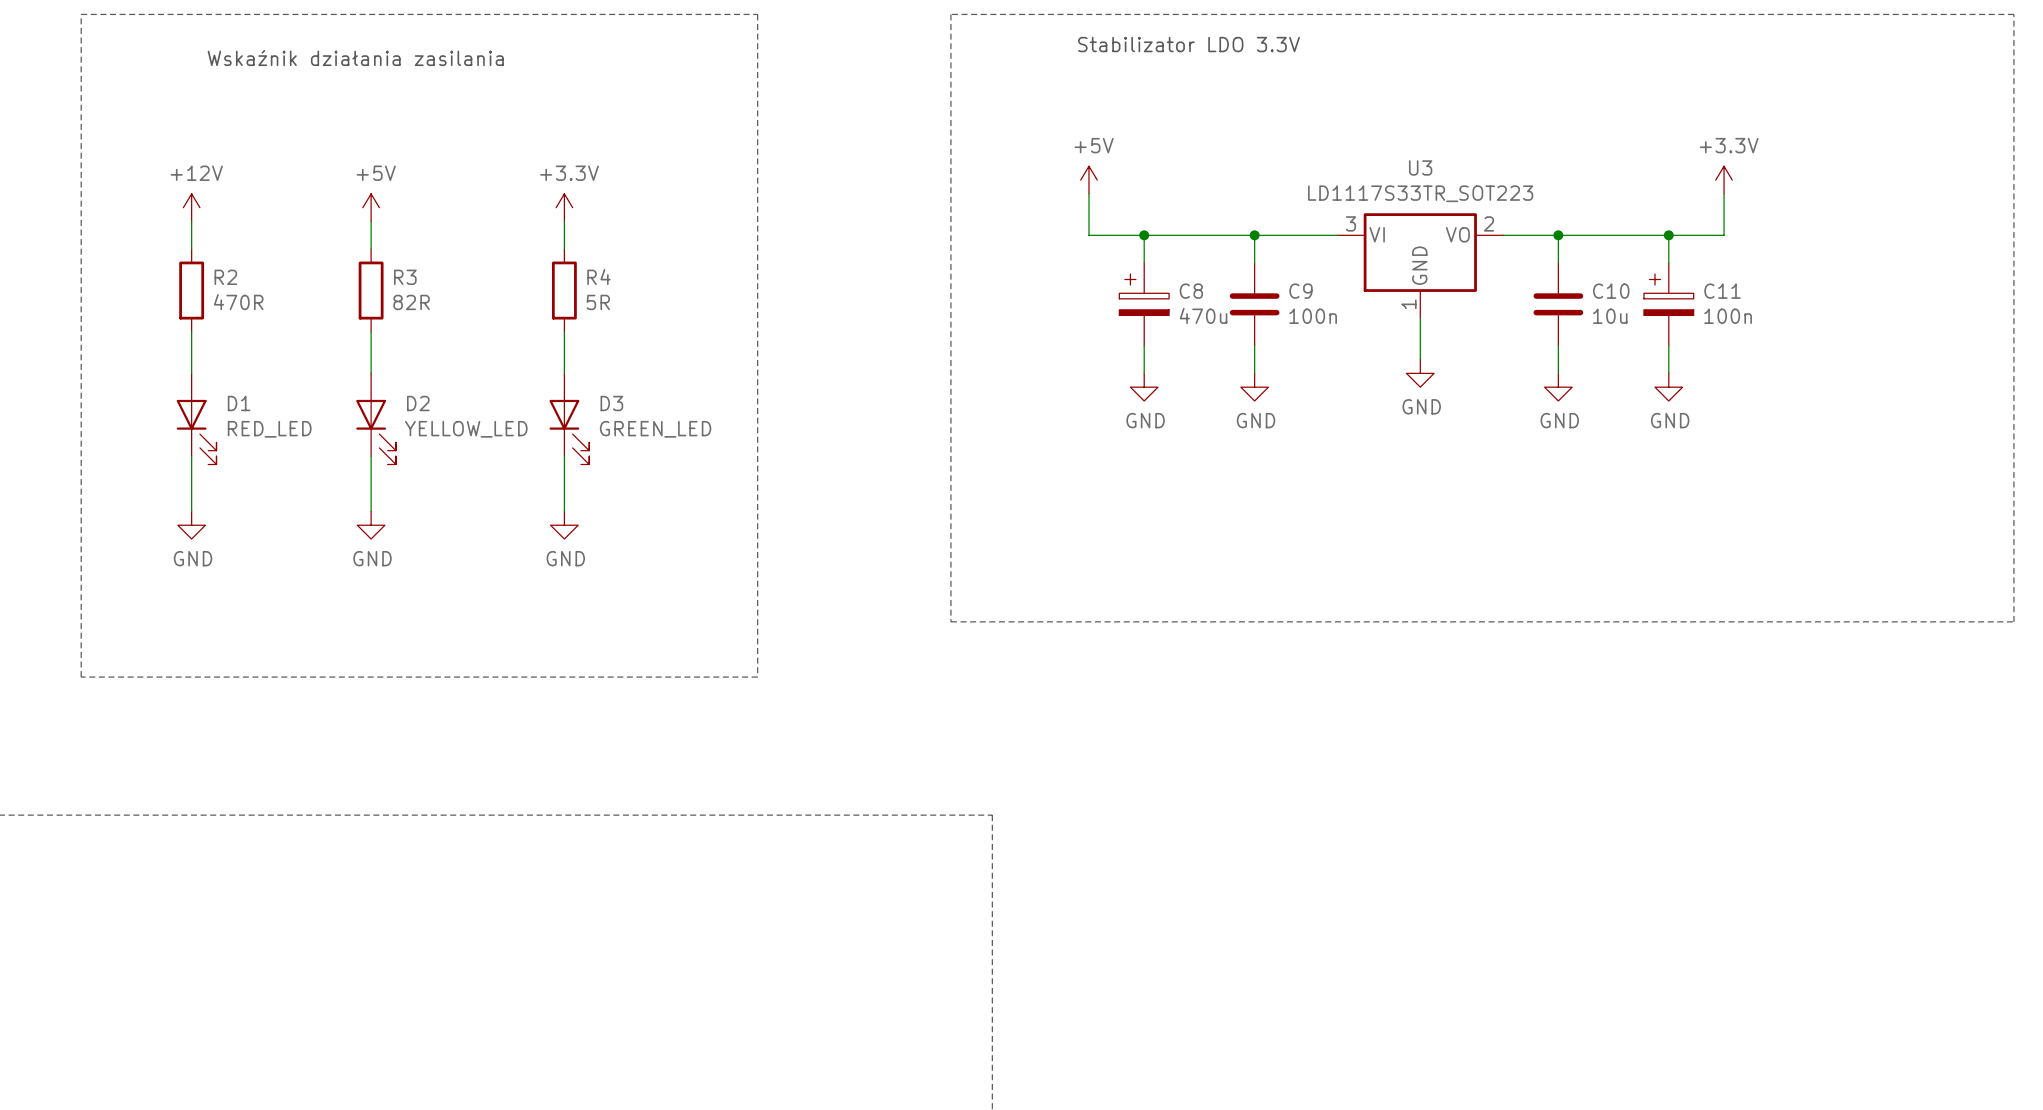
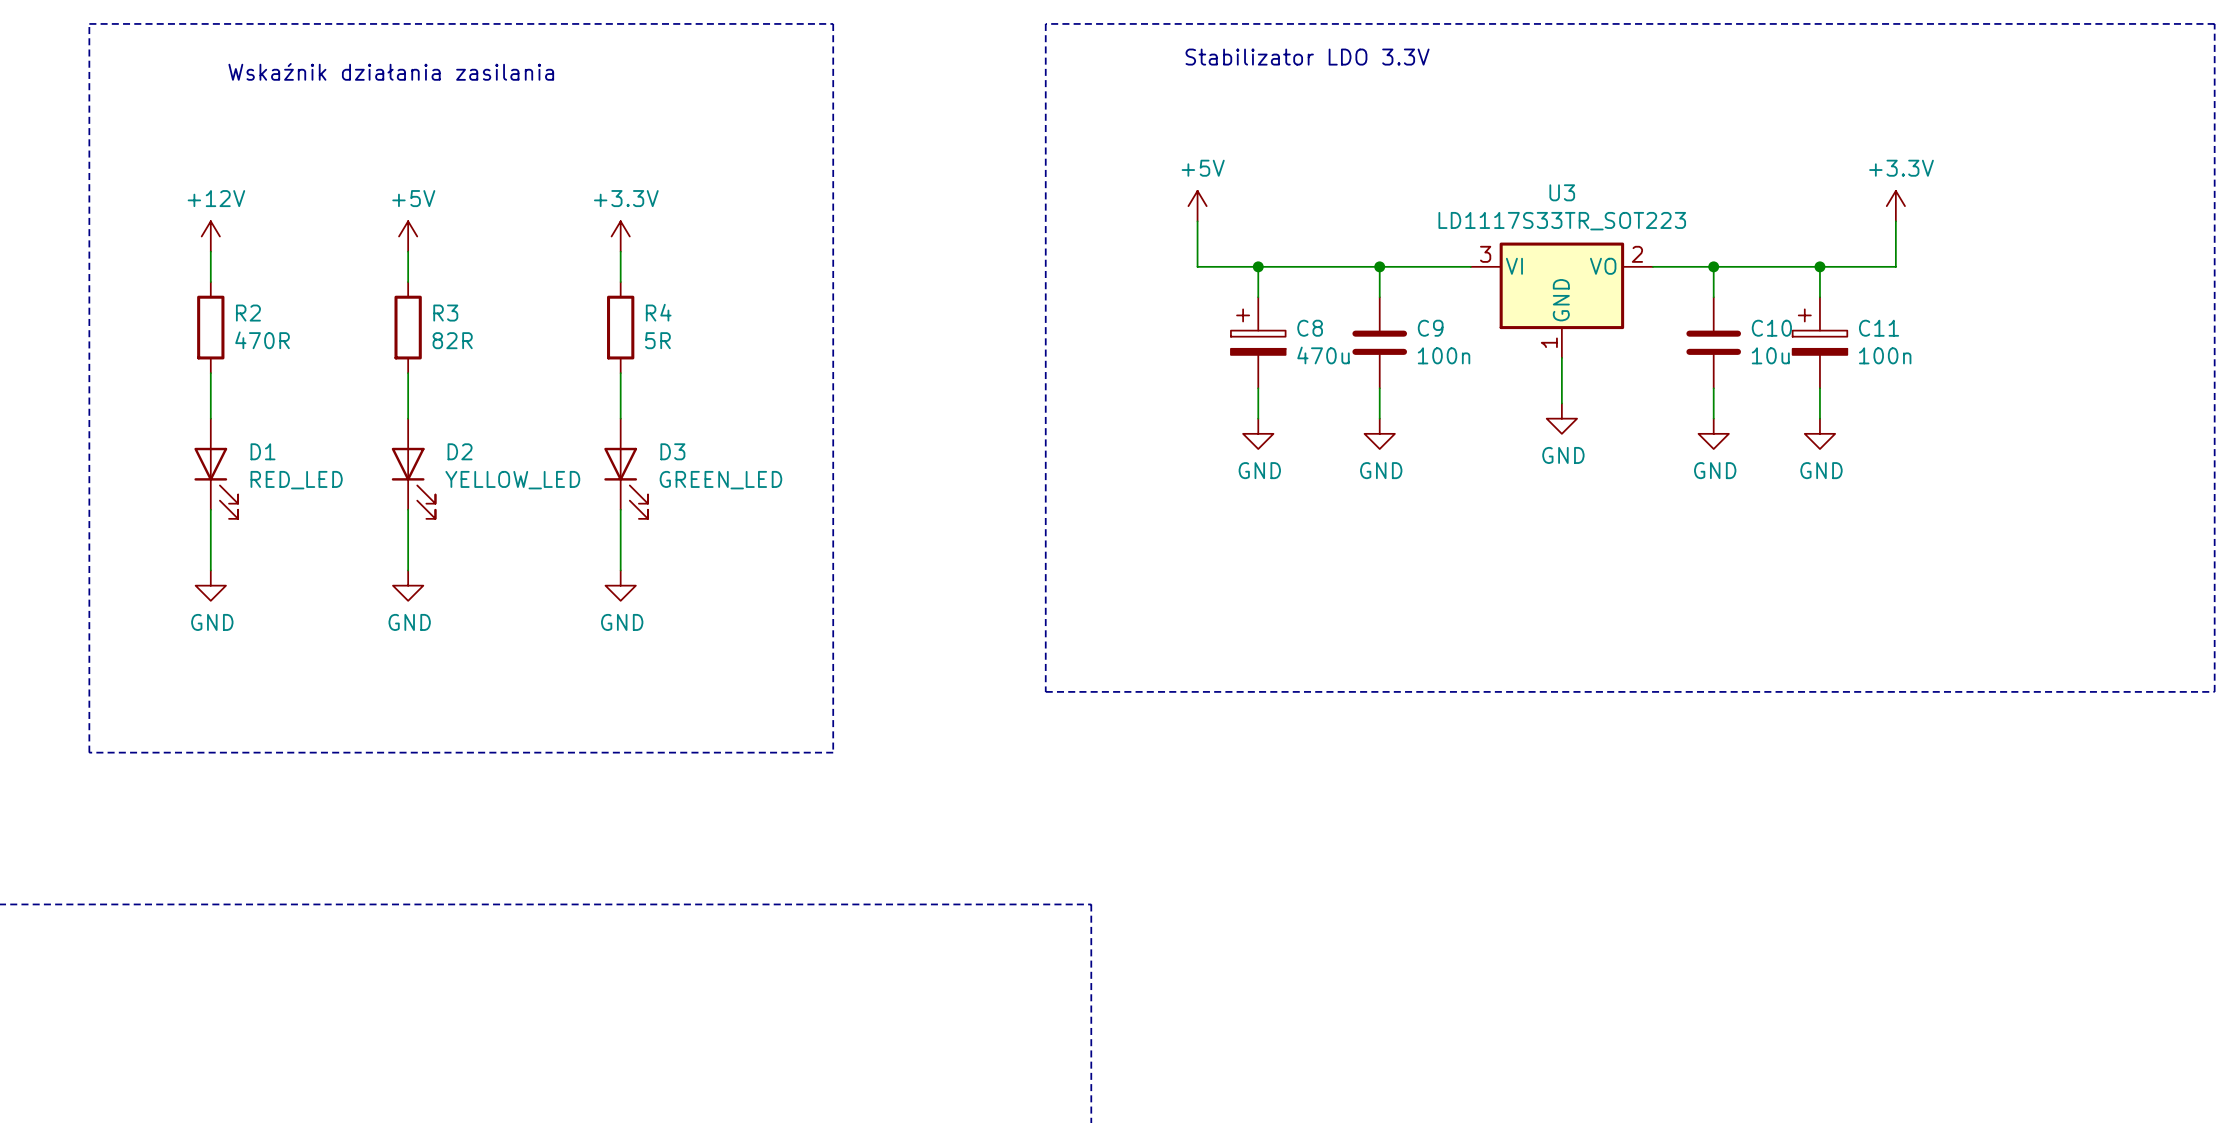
wire: (1668, 235) (1668, 262) -> (1819, 266) (1819, 297)
junction position: (1668, 235) -> (1819, 266)
C11 position: (1668, 304) -> (1819, 342)
wire: (1668, 345) (1668, 373) -> (1819, 388) (1819, 418)
power symbol position: GND (1668, 387) -> GND (1819, 433)

